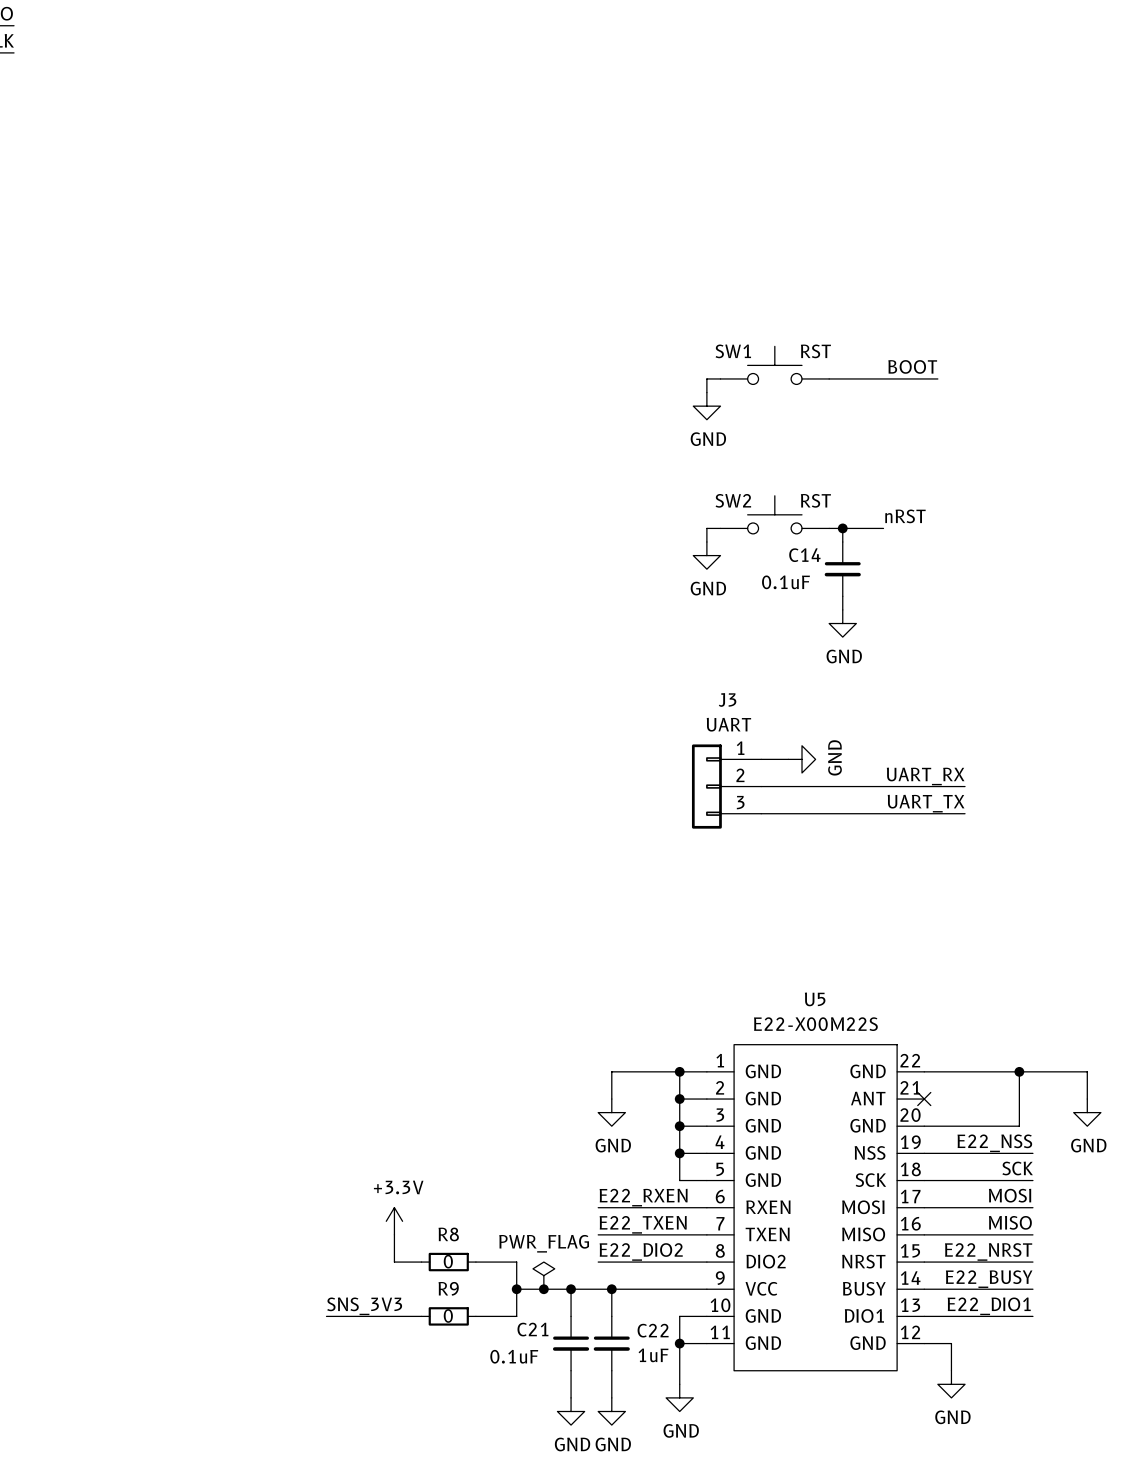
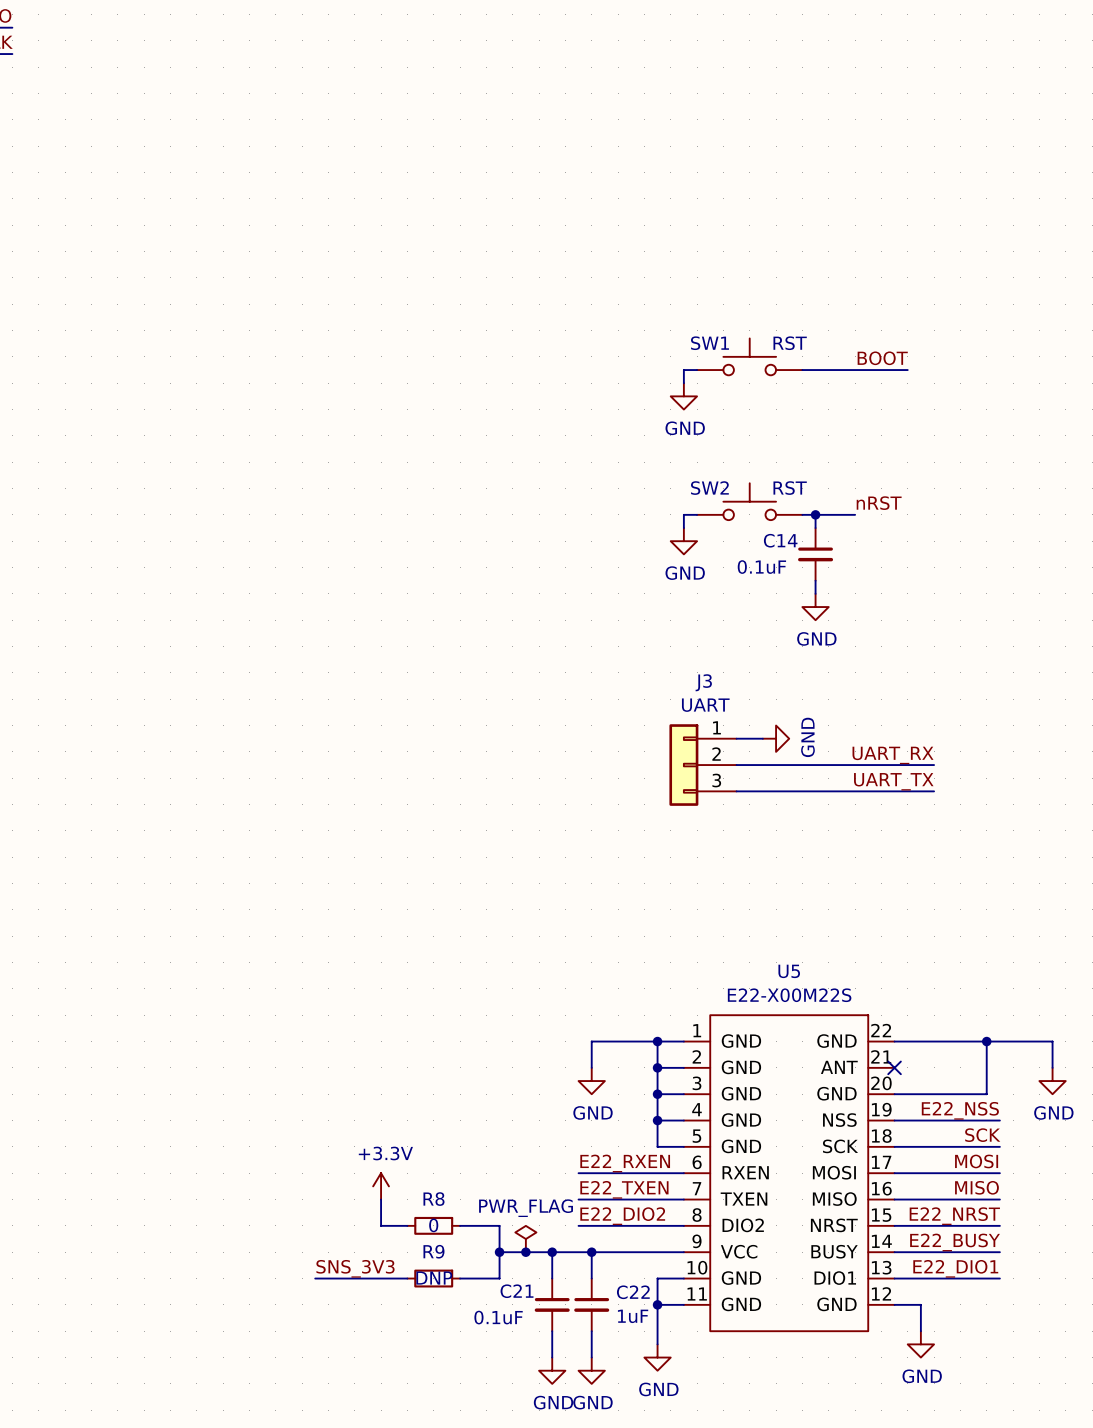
R9 value: 0 (448, 1315) -> DNP (434, 1278)

